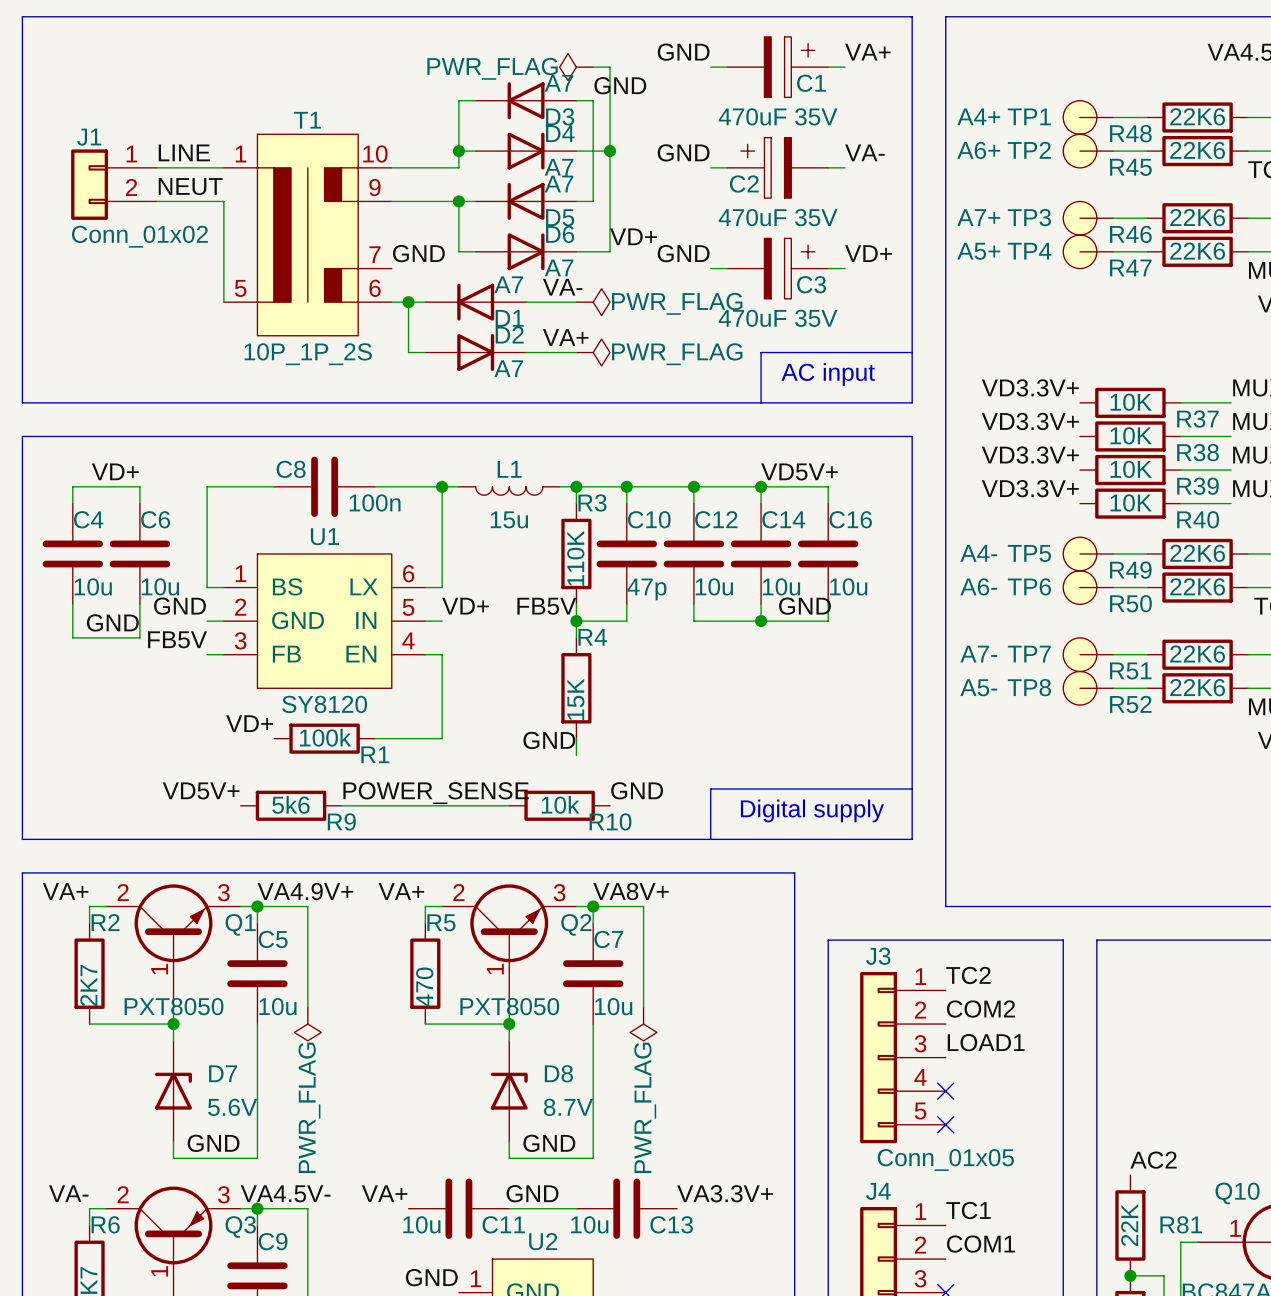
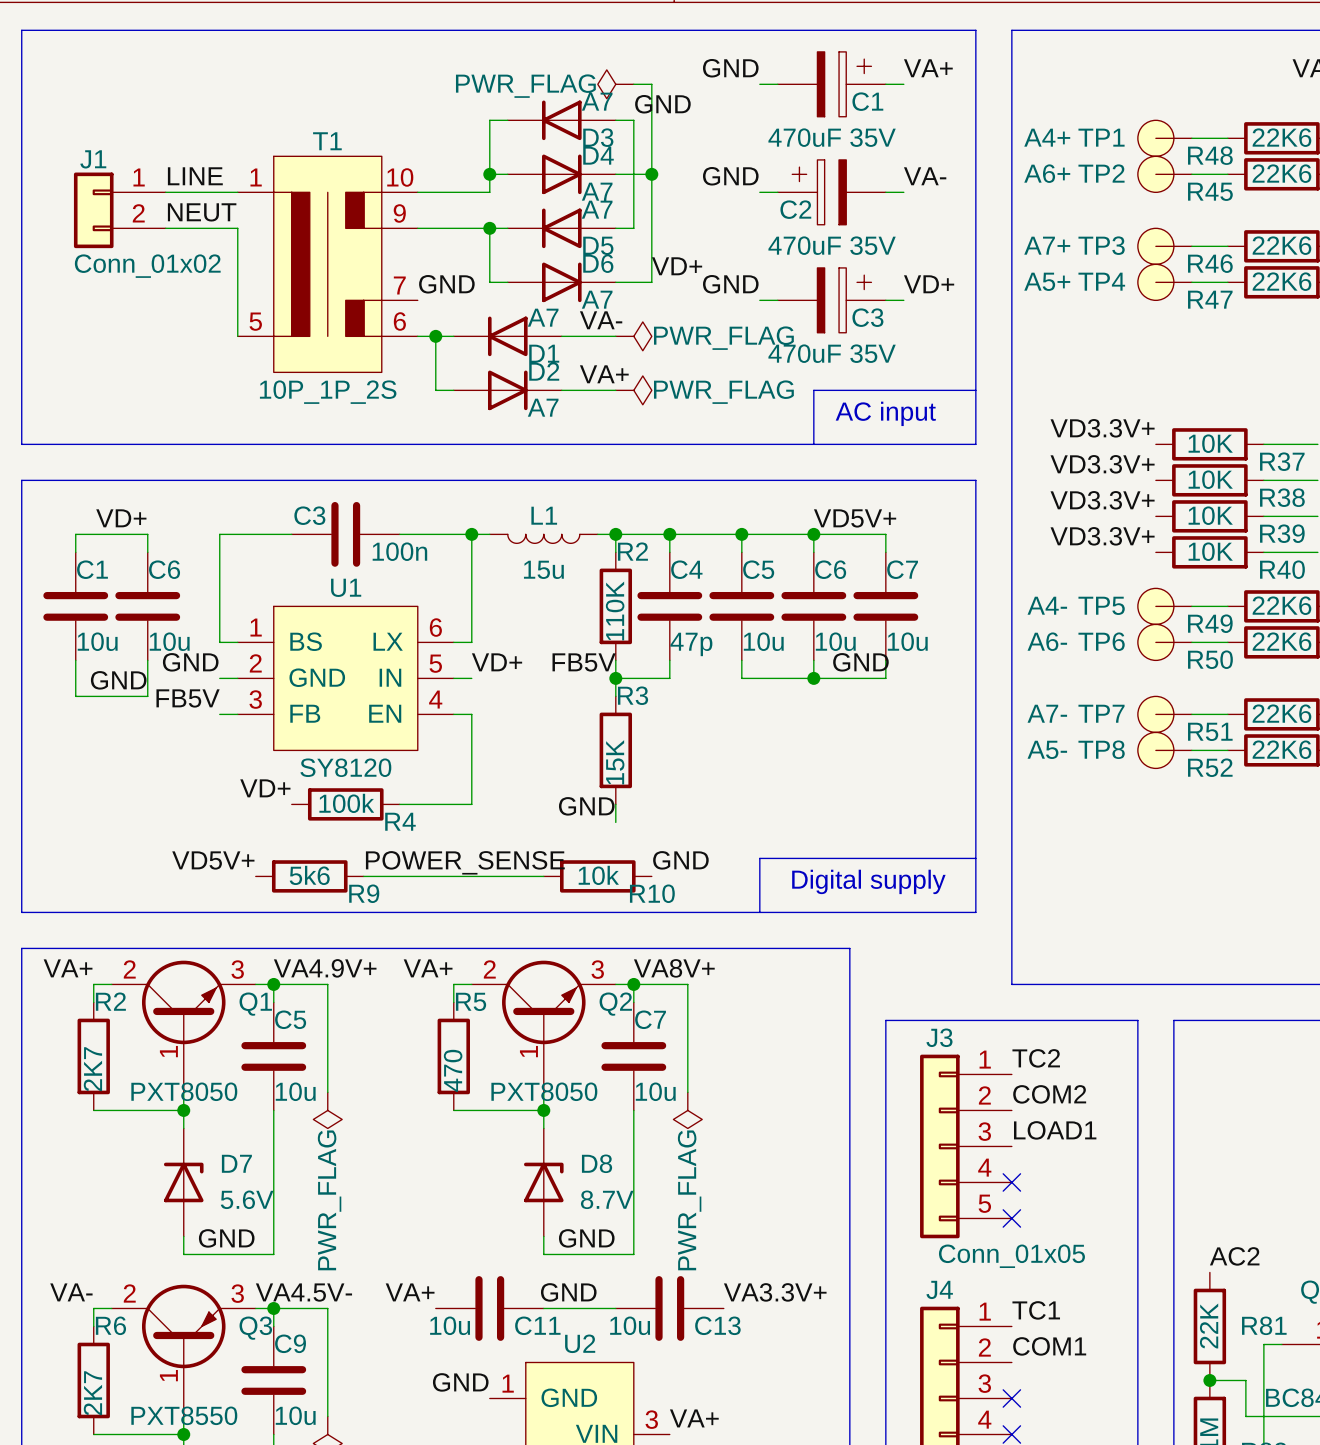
C8 name: C8 (291, 469) -> C3 (309, 515)
R3 name: R3 (592, 502) -> R2 (632, 551)
C4 name: C4 (88, 519) -> C1 (92, 569)
C10 name: C10 (649, 519) -> C4 (686, 569)
C12 name: C12 (716, 519) -> C5 (758, 569)
C14 name: C14 (783, 519) -> C6 (830, 569)
C16 name: C16 (850, 519) -> C7 (902, 569)
R4 name: R4 (592, 637) -> R3 (633, 695)
R1 name: R1 (375, 754) -> R4 (400, 821)

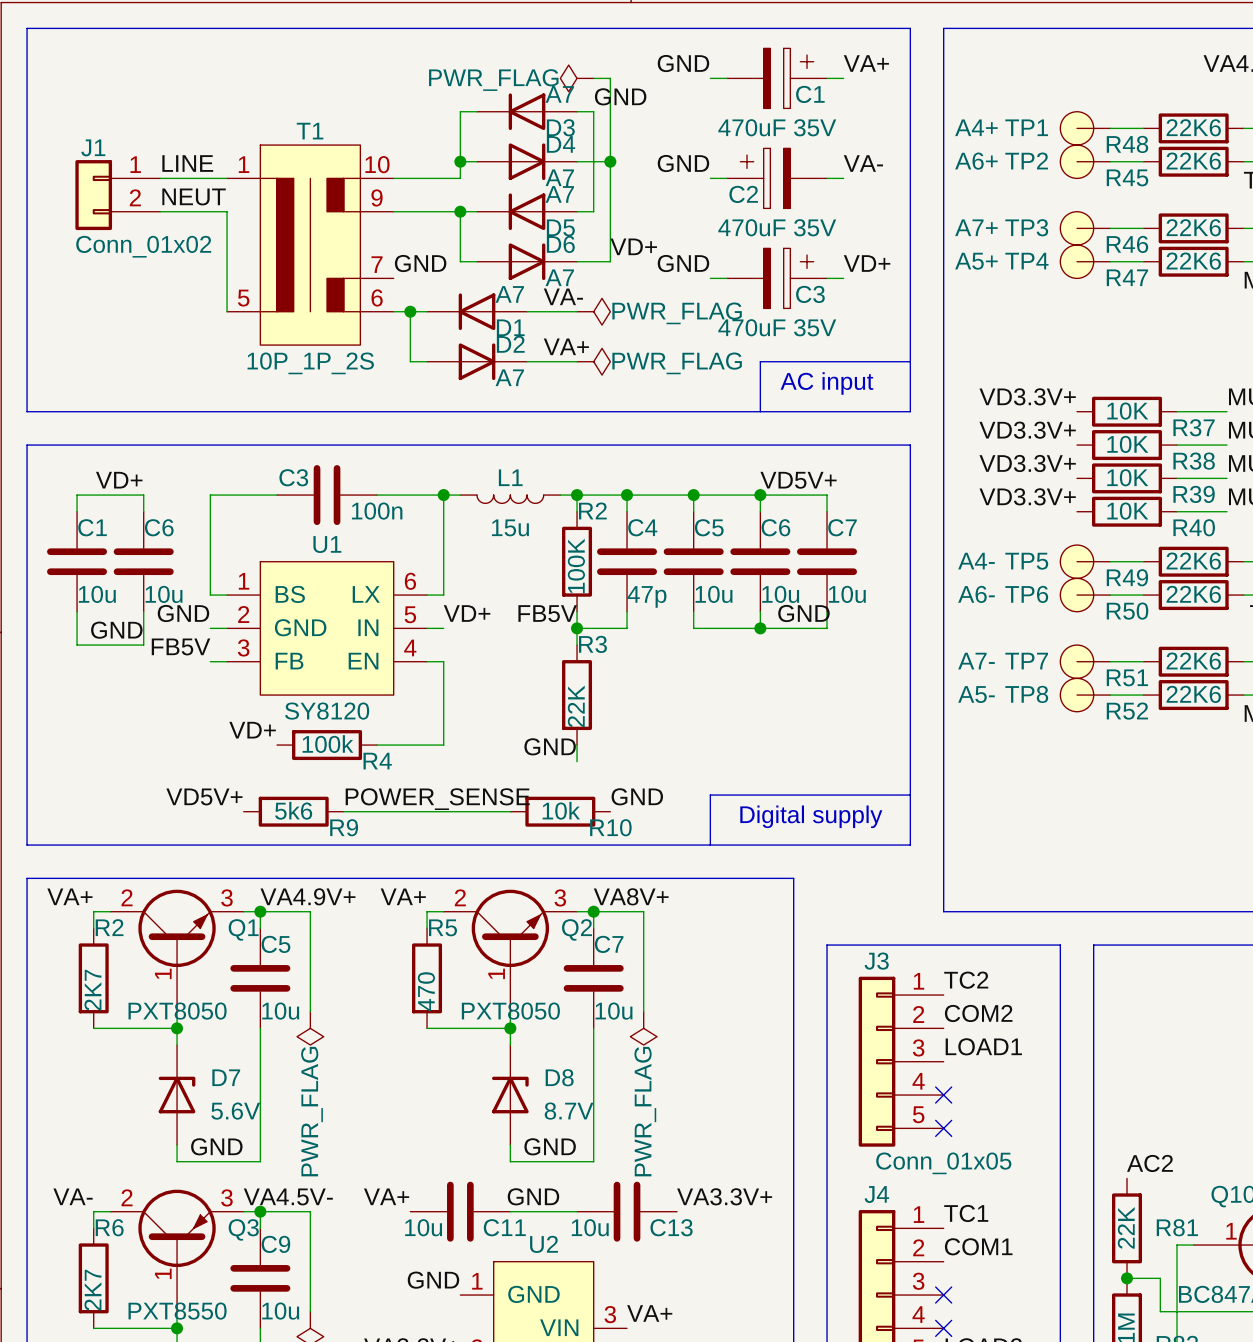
R2 value: 110K (615, 610) -> 100K (576, 565)
R3 value: 15K (615, 762) -> 22K (576, 706)

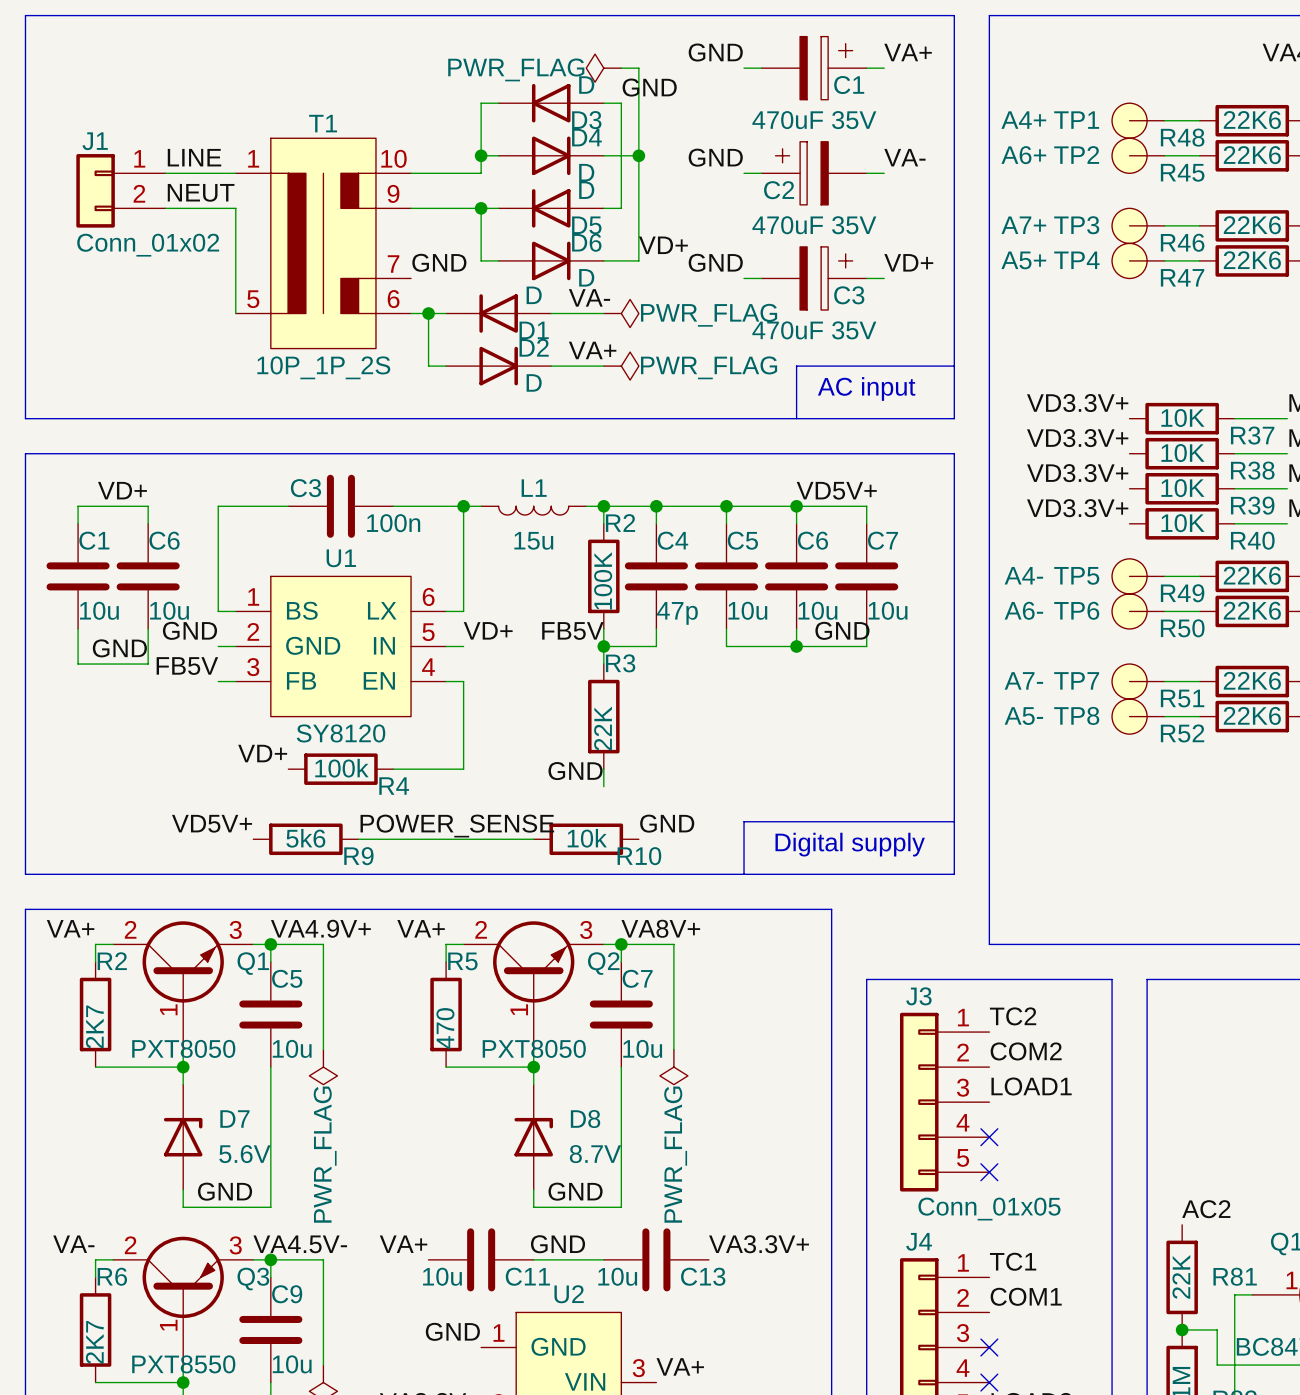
D3 value: A7 (559, 94) -> D (586, 85)
D4 value: A7 (559, 177) -> D (586, 172)
D5 value: A7 (559, 194) -> D (586, 190)
D6 value: A7 (559, 277) -> D (586, 277)
D1 value: A7 (509, 294) -> D (534, 295)
D2 value: A7 (509, 377) -> D (534, 382)

